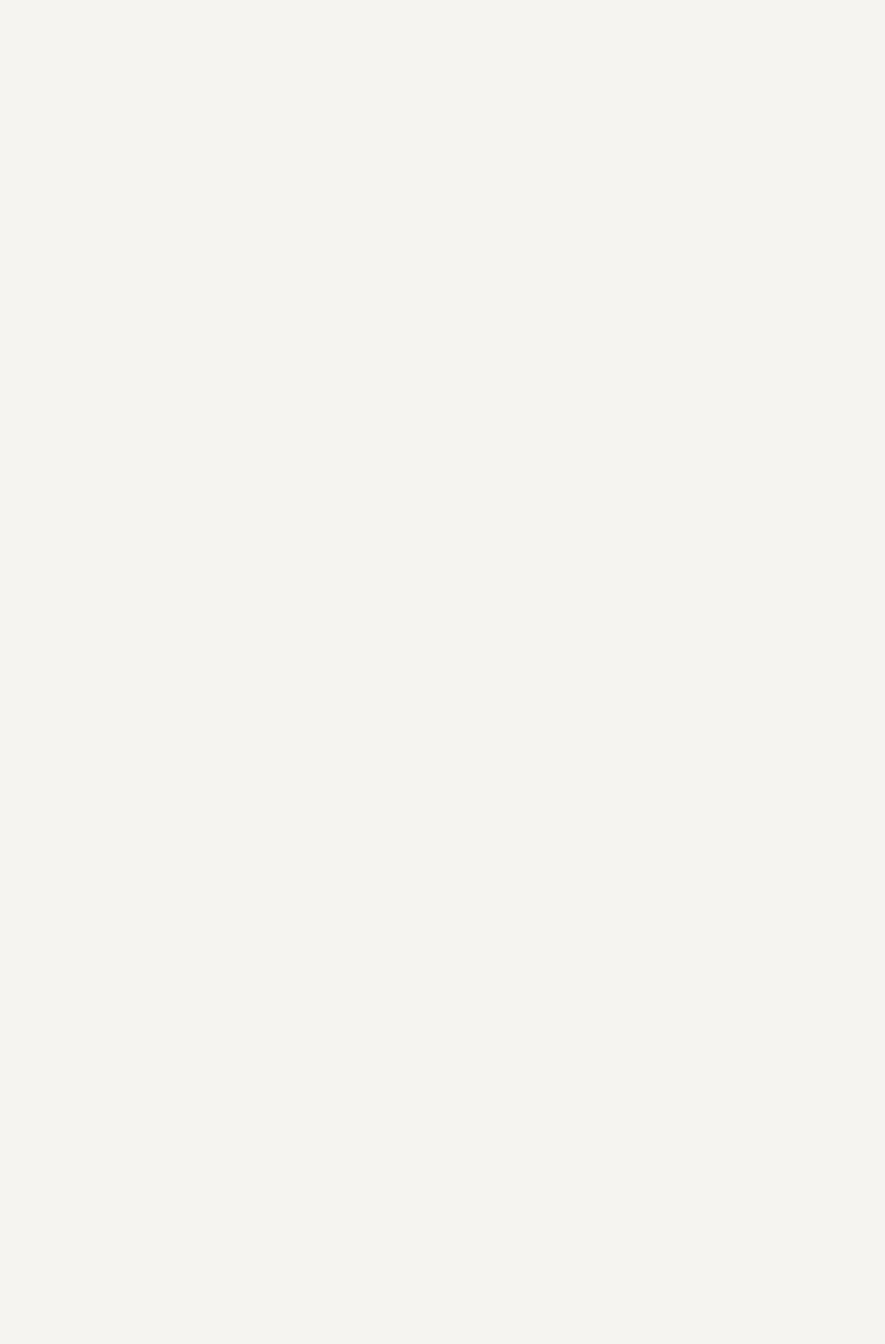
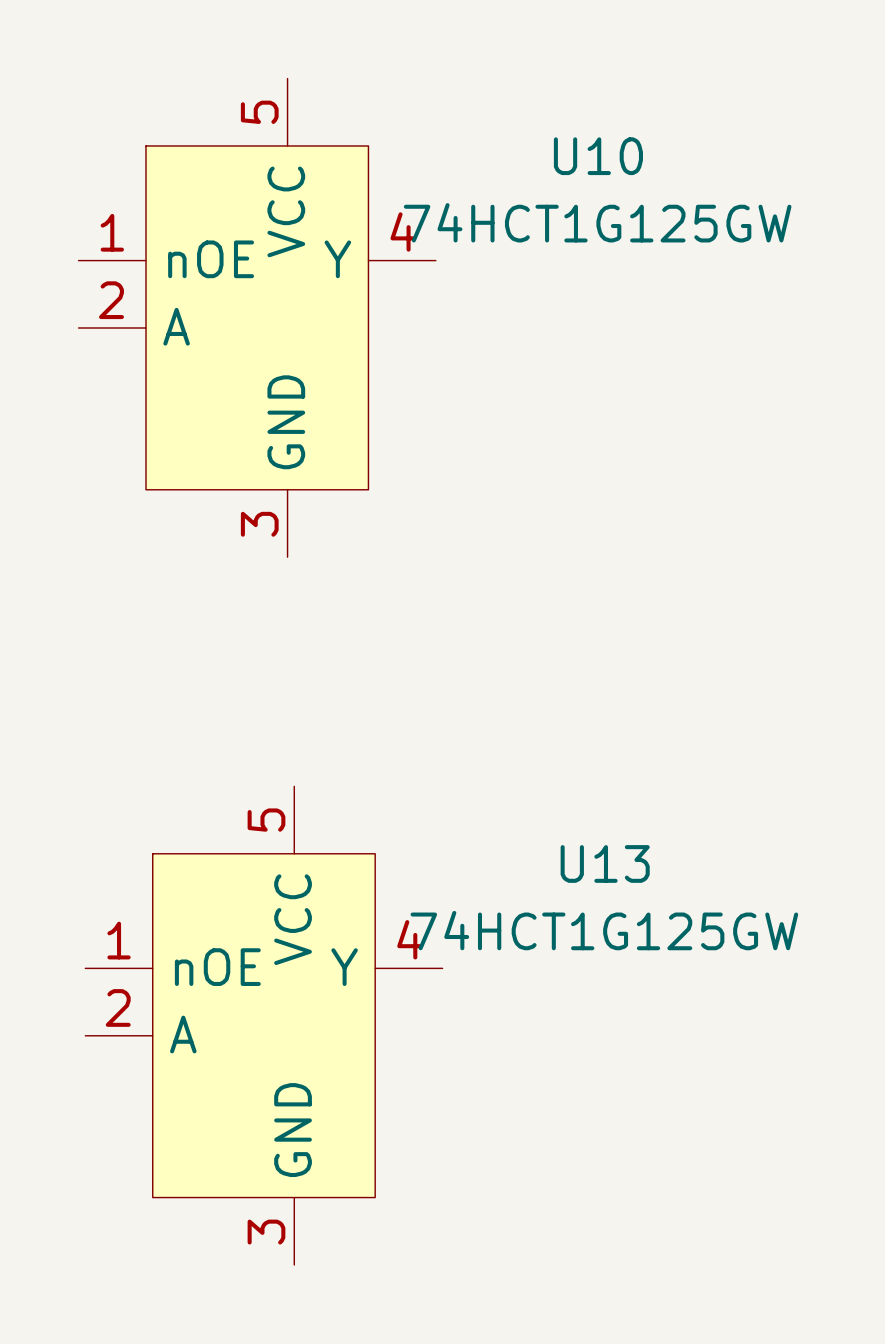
U10: none -> 74HCT1G125GW (257, 317)
U13: none -> 74HCT1G125GW (263, 1025)

